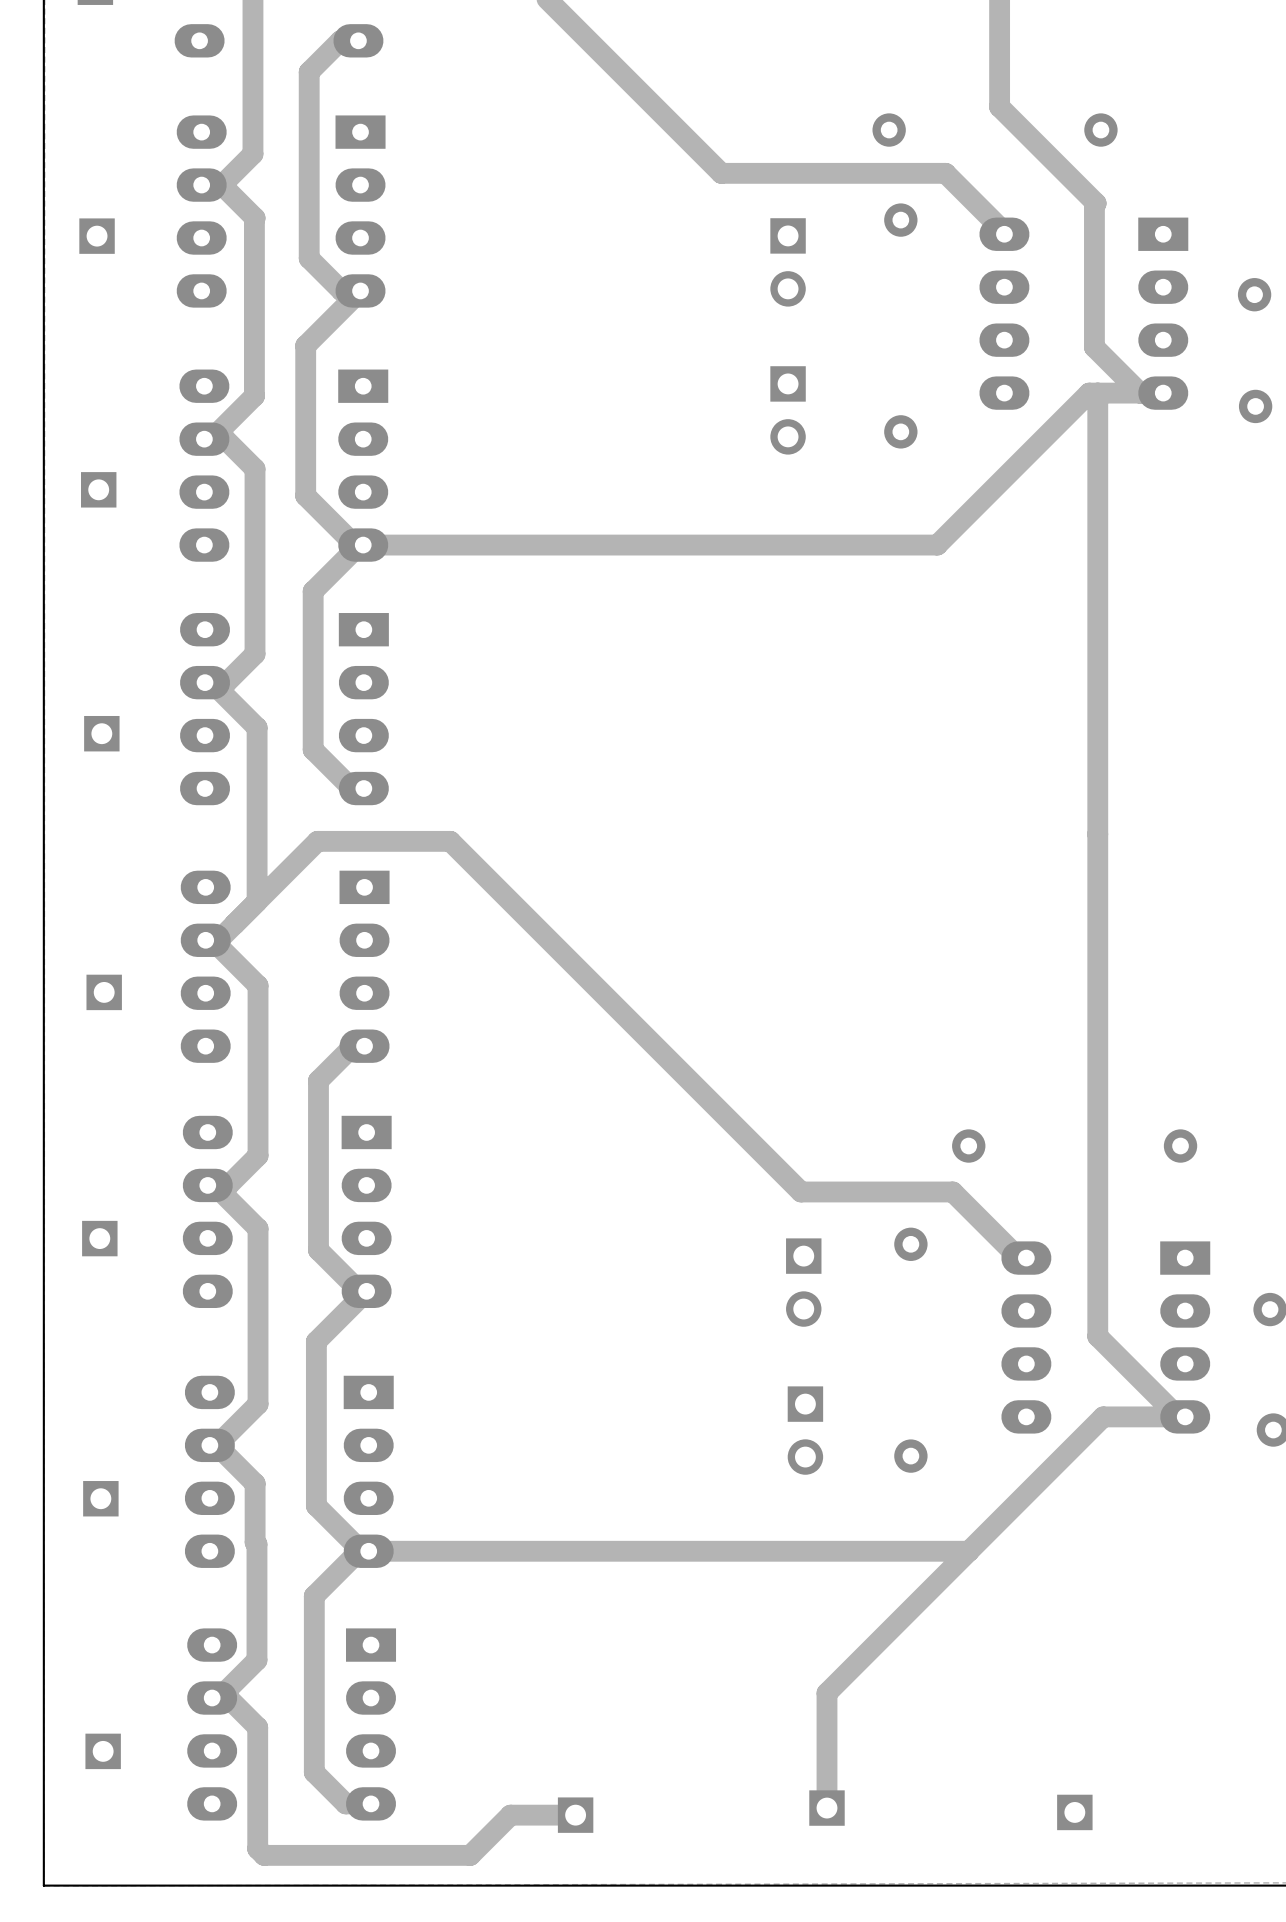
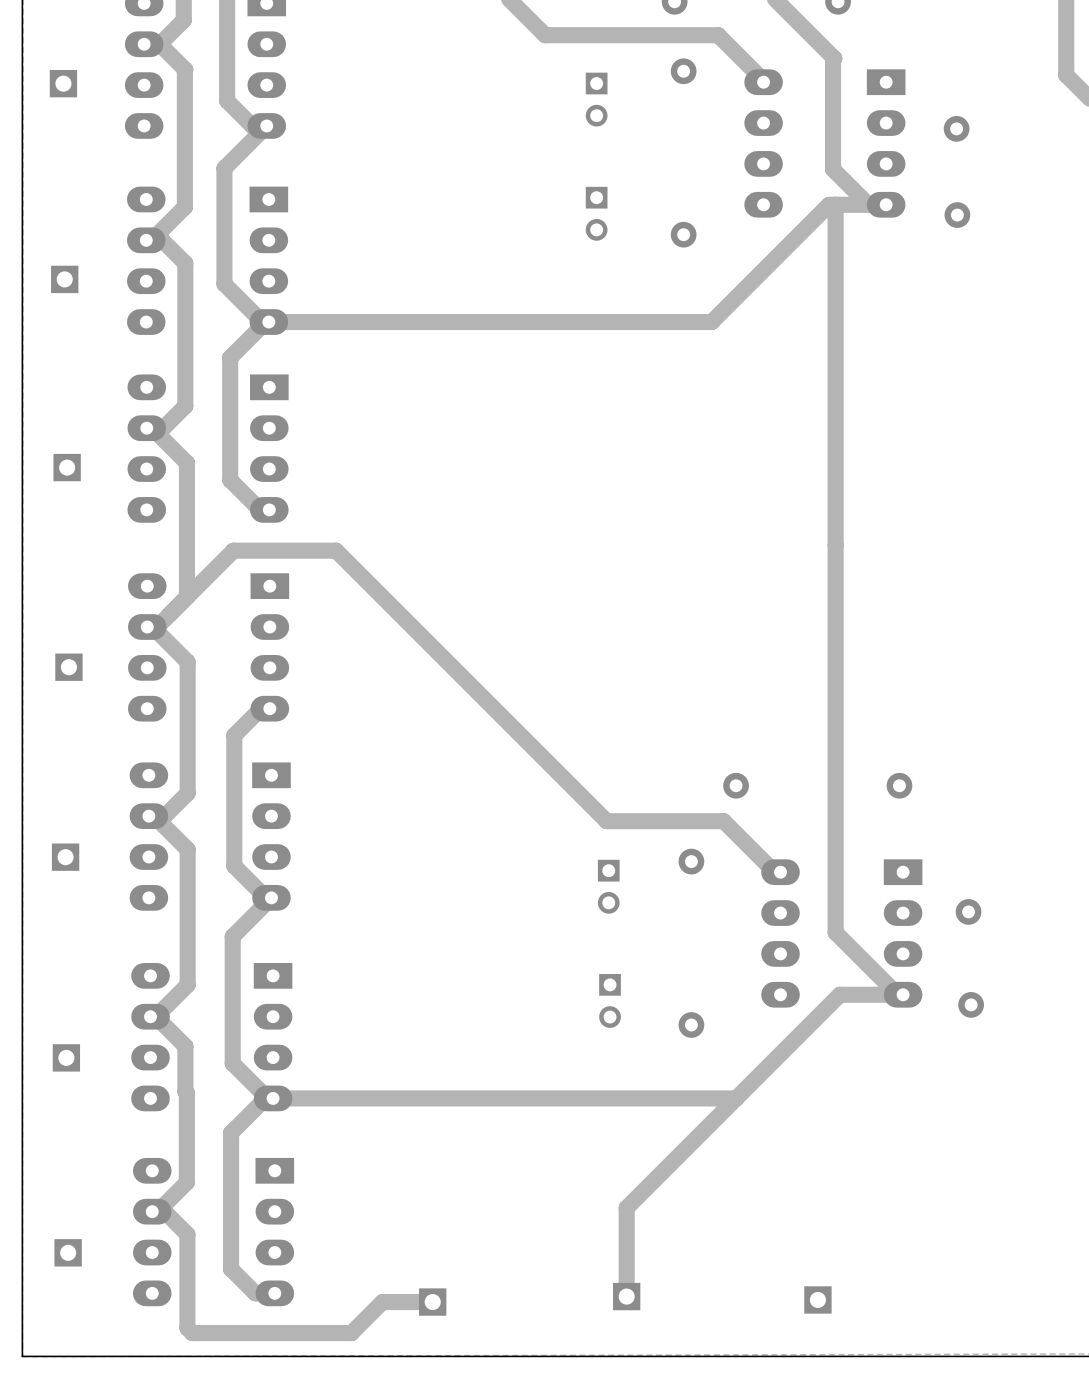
part footprint: [770, 218, 806, 307] -> [585, 72, 608, 127]
part footprint: [770, 366, 806, 455] -> [585, 186, 608, 241]
part footprint: [786, 1238, 822, 1327] -> [597, 859, 620, 914]
part footprint: [787, 1386, 824, 1475] -> [599, 974, 621, 1028]

